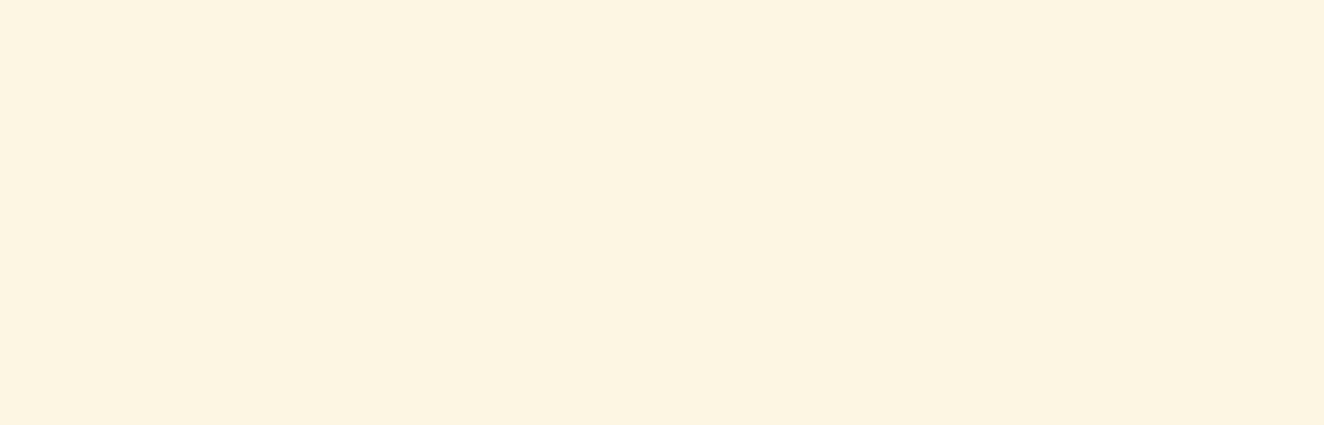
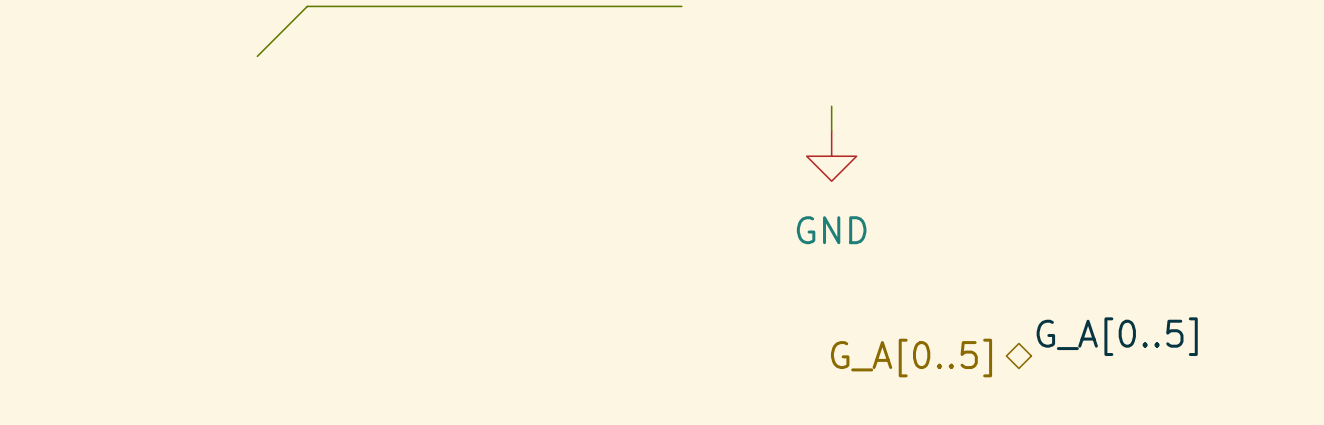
wire: none -> (681, 6) (307, 6) (257, 56)
wire: none -> (831, 106) (831, 131)
power symbol: none -> GND (831, 156)
label: none -> G_A[0..5] (1117, 336)
hierarchical label: none -> G_A[0..5] (911, 358)

